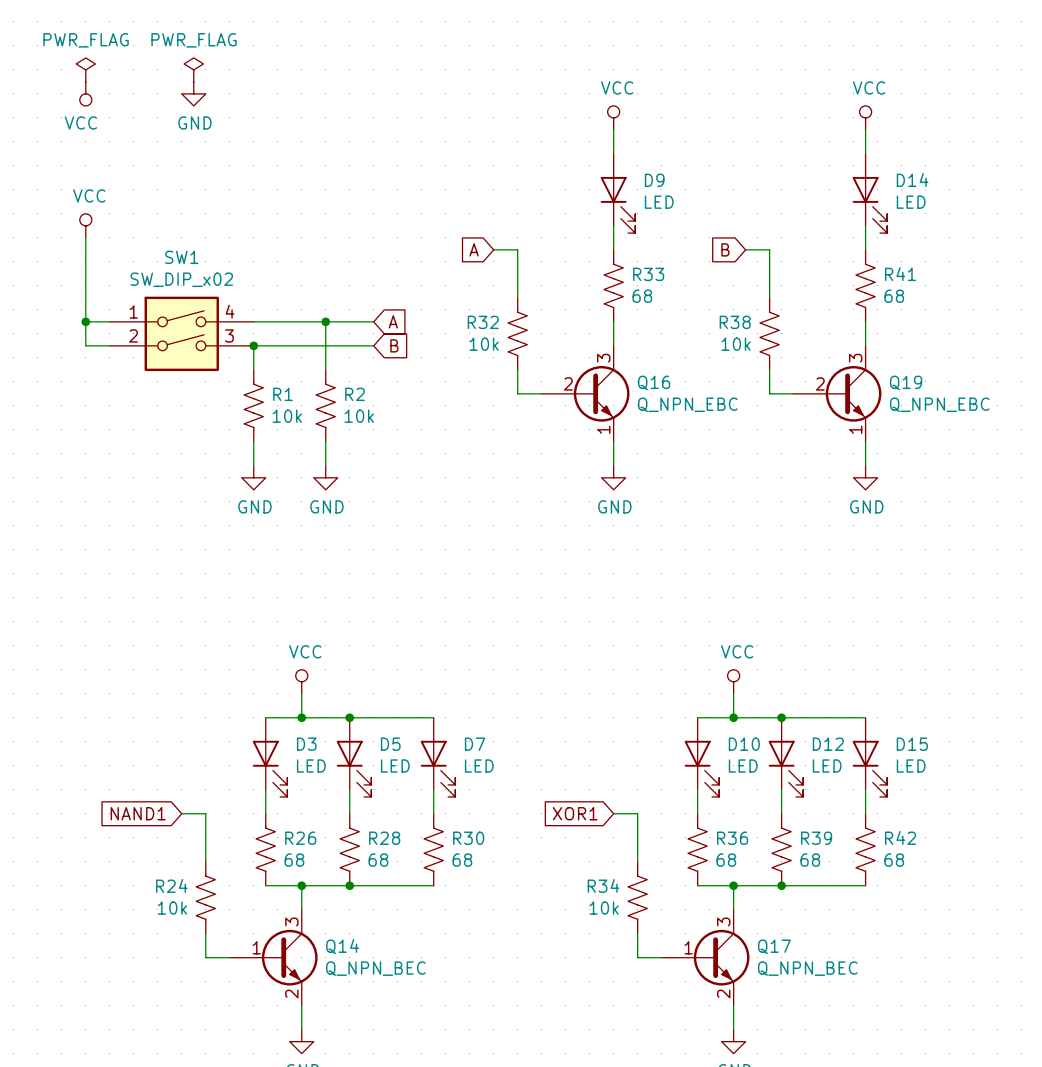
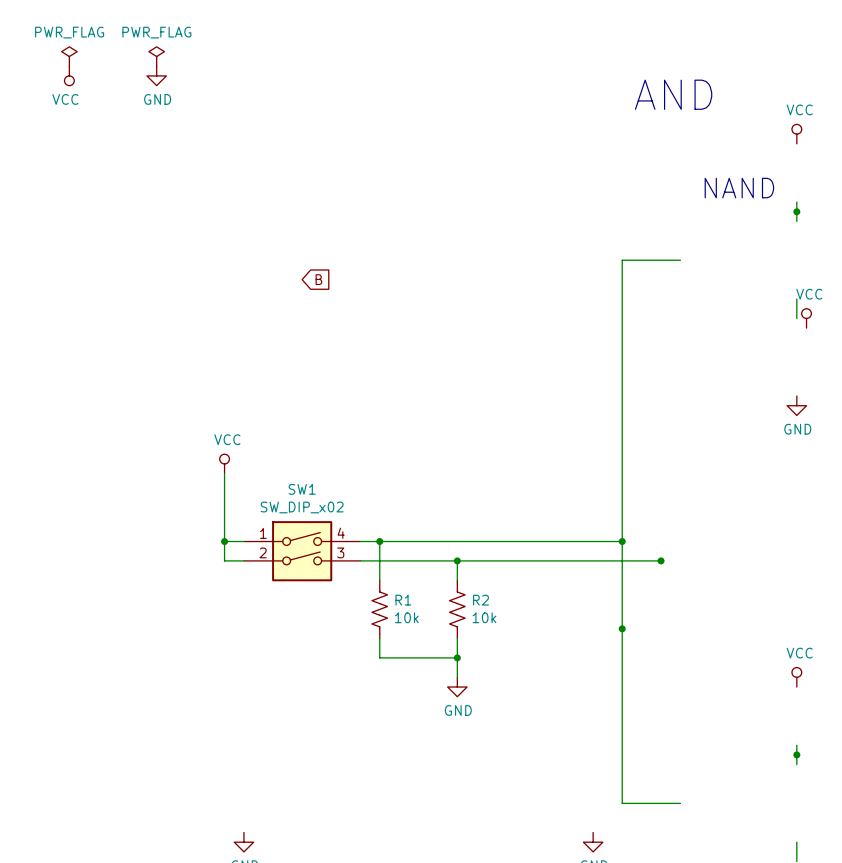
power symbol: VCC (613, 117) -> none
text: none -> AND (673, 94)
power symbol position: VCC (865, 117) -> VCC (796, 134)
wire: (613, 129) (613, 153) -> none
wire: (865, 129) (865, 153) -> none
D9: LED (617, 193) -> none
D14: LED (869, 193) -> none
power symbol: VCC (85, 225) -> none
wire: (613, 225) (613, 249) -> none
wire: (865, 225) (865, 249) -> none
text: none -> NAND (739, 188)
wire: (85, 237) (85, 345) (109, 345) -> none
global label: A (474, 249) -> none
wire: (493, 249) (517, 249) (517, 297) -> none
global label: B (725, 249) -> none
wire: (745, 249) (769, 249) (769, 297) -> none
junction: none -> (796, 211)
R33: 68 (613, 285) -> none
R41: 68 (865, 285) -> none
wire: (85, 321) (109, 321) -> none
junction: (85, 321) -> none
wire: (253, 321) (373, 321) -> none
wire: (325, 321) (325, 369) -> none
junction: (325, 321) -> none
global label: A (393, 321) -> none
wire: (613, 321) (613, 345) -> none
wire: none -> (680, 260) (622, 260) (622, 299)
wire: (865, 321) (865, 345) -> (796, 202) (796, 221)
SW1 position: (181, 333) -> (302, 551)
R32: 10k (517, 333) -> none
R38: 10k (769, 333) -> none
junction: (253, 345) -> none
wire: (373, 345) (253, 345) (253, 369) -> none
wire: (517, 369) (517, 393) (541, 393) -> none
Q16: Q_NPN_EBC (585, 393) -> none
wire: (769, 393) (793, 393) -> (622, 318) (622, 803) (680, 803)
Q19: Q_NPN_EBC (837, 393) -> none
power symbol: none -> VCC (806, 318)
R1 position: (253, 405) -> (379, 609)
R2 position: (325, 405) -> (457, 609)
wire: (253, 441) (253, 465) -> none
wire: (325, 441) (325, 465) -> none
wire: (613, 441) (613, 465) -> none
wire: (865, 441) (865, 465) -> (796, 299) (796, 318)
power symbol: GND (253, 477) -> none
power symbol: GND (325, 477) -> none
power symbol: GND (613, 477) -> none
power symbol position: GND (865, 477) -> GND (796, 405)
wire: none -> (224, 541) (243, 541)
junction: none -> (224, 541)
wire: none -> (360, 541) (622, 541)
wire: none -> (379, 541) (379, 580)
junction: none -> (379, 541)
junction: none -> (622, 541)
power symbol position: VCC (301, 681) -> VCC (224, 463)
power symbol: VCC (733, 681) -> none
wire: (301, 693) (301, 717) -> (243, 560) (224, 560) (224, 473)
wire: none -> (360, 560) (661, 560)
junction: none -> (457, 560)
wire: (733, 693) (733, 717) -> none
junction: none -> (661, 560)
wire: (265, 717) (433, 717) -> none
junction: (301, 717) -> none
junction: (349, 717) -> none
wire: (697, 717) (865, 717) -> none
junction: (733, 717) -> none
junction: (781, 717) -> none
D3: LED (270, 757) -> none
D5: LED (354, 757) -> none
D7: LED (438, 757) -> none
D10: LED (701, 757) -> none
D12: LED (785, 757) -> none
D15: LED (869, 757) -> none
junction: none -> (622, 628)
wire: (265, 789) (265, 813) -> none
wire: (349, 789) (349, 813) -> none
wire: (433, 789) (433, 813) -> (457, 560) (457, 580)
wire: none -> (379, 638) (379, 657) (457, 657)
wire: none -> (457, 638) (457, 677)
wire: (697, 789) (697, 813) -> none
wire: (781, 789) (781, 813) -> none
wire: (865, 789) (865, 813) -> (796, 745) (796, 764)
global label: NAND1 (138, 813) -> none
wire: (181, 813) (205, 813) (205, 861) -> none
junction: none -> (457, 657)
global label: XOR1 (575, 813) -> none
wire: (613, 813) (637, 813) (637, 861) -> none
power symbol: none -> VCC (796, 677)
R26: 68 (265, 849) -> none
R28: 68 (349, 849) -> none
R30: 68 (433, 849) -> none
power symbol: none -> GND (457, 687)
R36: 68 (697, 849) -> none
R39: 68 (781, 849) -> none
R42: 68 (865, 849) -> none
wire: (265, 885) (433, 885) -> none
wire: (301, 885) (301, 909) -> none
junction: (301, 885) -> none
junction: (349, 885) -> none
wire: (697, 885) (865, 885) -> none
wire: (733, 885) (733, 909) -> none
junction: (733, 885) -> none
junction: (781, 885) -> none
R24: 10k (205, 897) -> none
R34: 10k (637, 897) -> none
wire: (205, 933) (205, 957) (229, 957) -> none
wire: (637, 933) (637, 957) (661, 957) -> none
junction: none -> (796, 754)
Q14: Q_NPN_BEC (273, 957) -> none
Q17: Q_NPN_BEC (705, 957) -> none
wire: (301, 1005) (301, 1029) -> none
wire: (733, 1005) (733, 1029) -> none
wire: none -> (796, 842) (796, 861)

